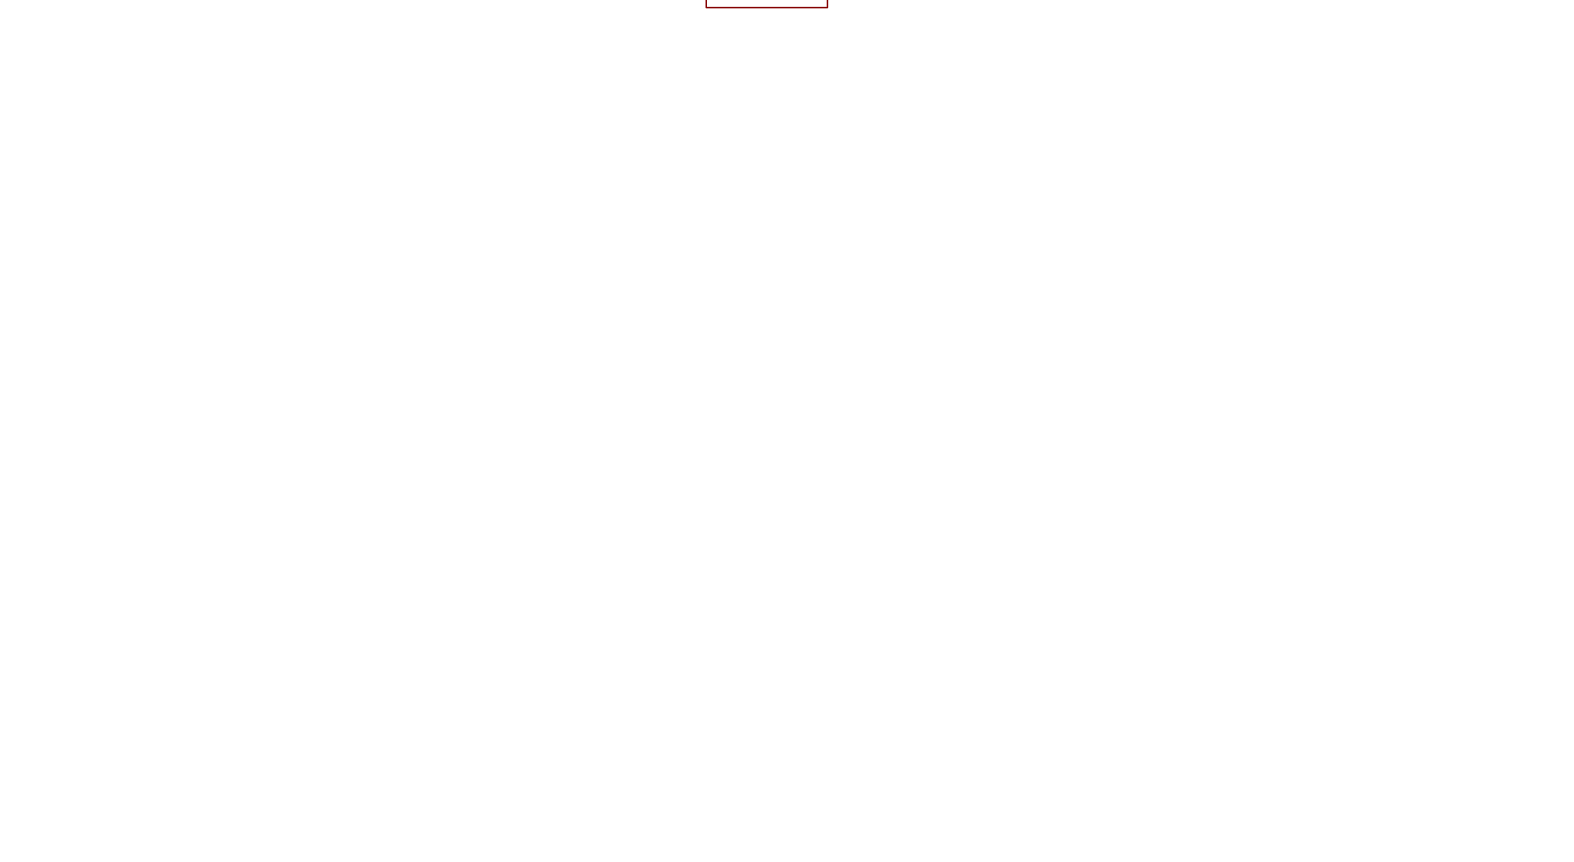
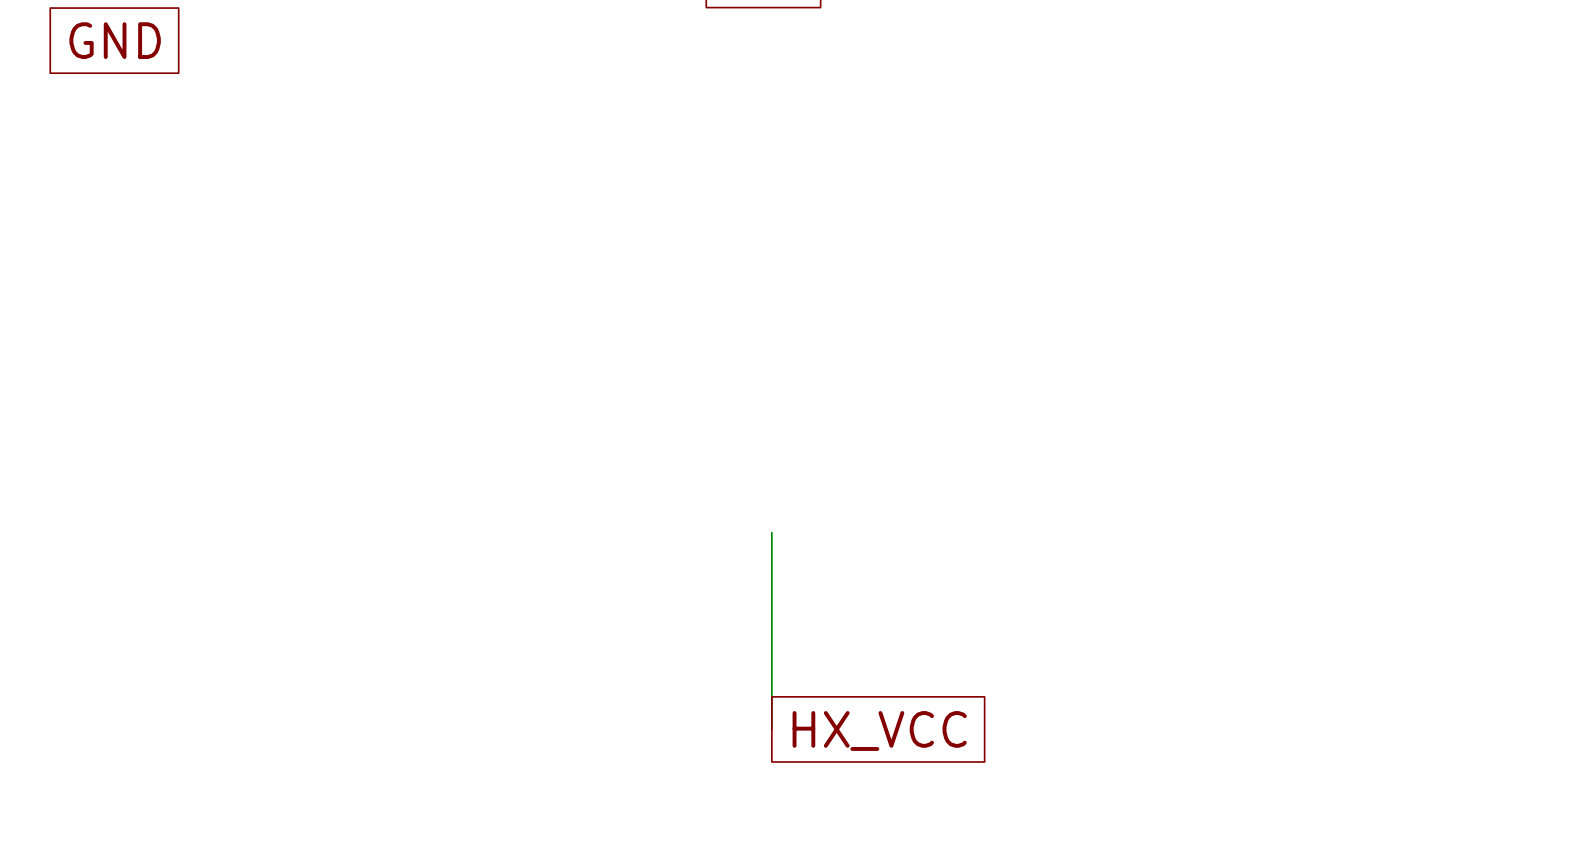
global label: none -> GND (115, 40)
wire: none -> (771, 532) (771, 729)
global label: none -> HX_VCC (879, 730)

